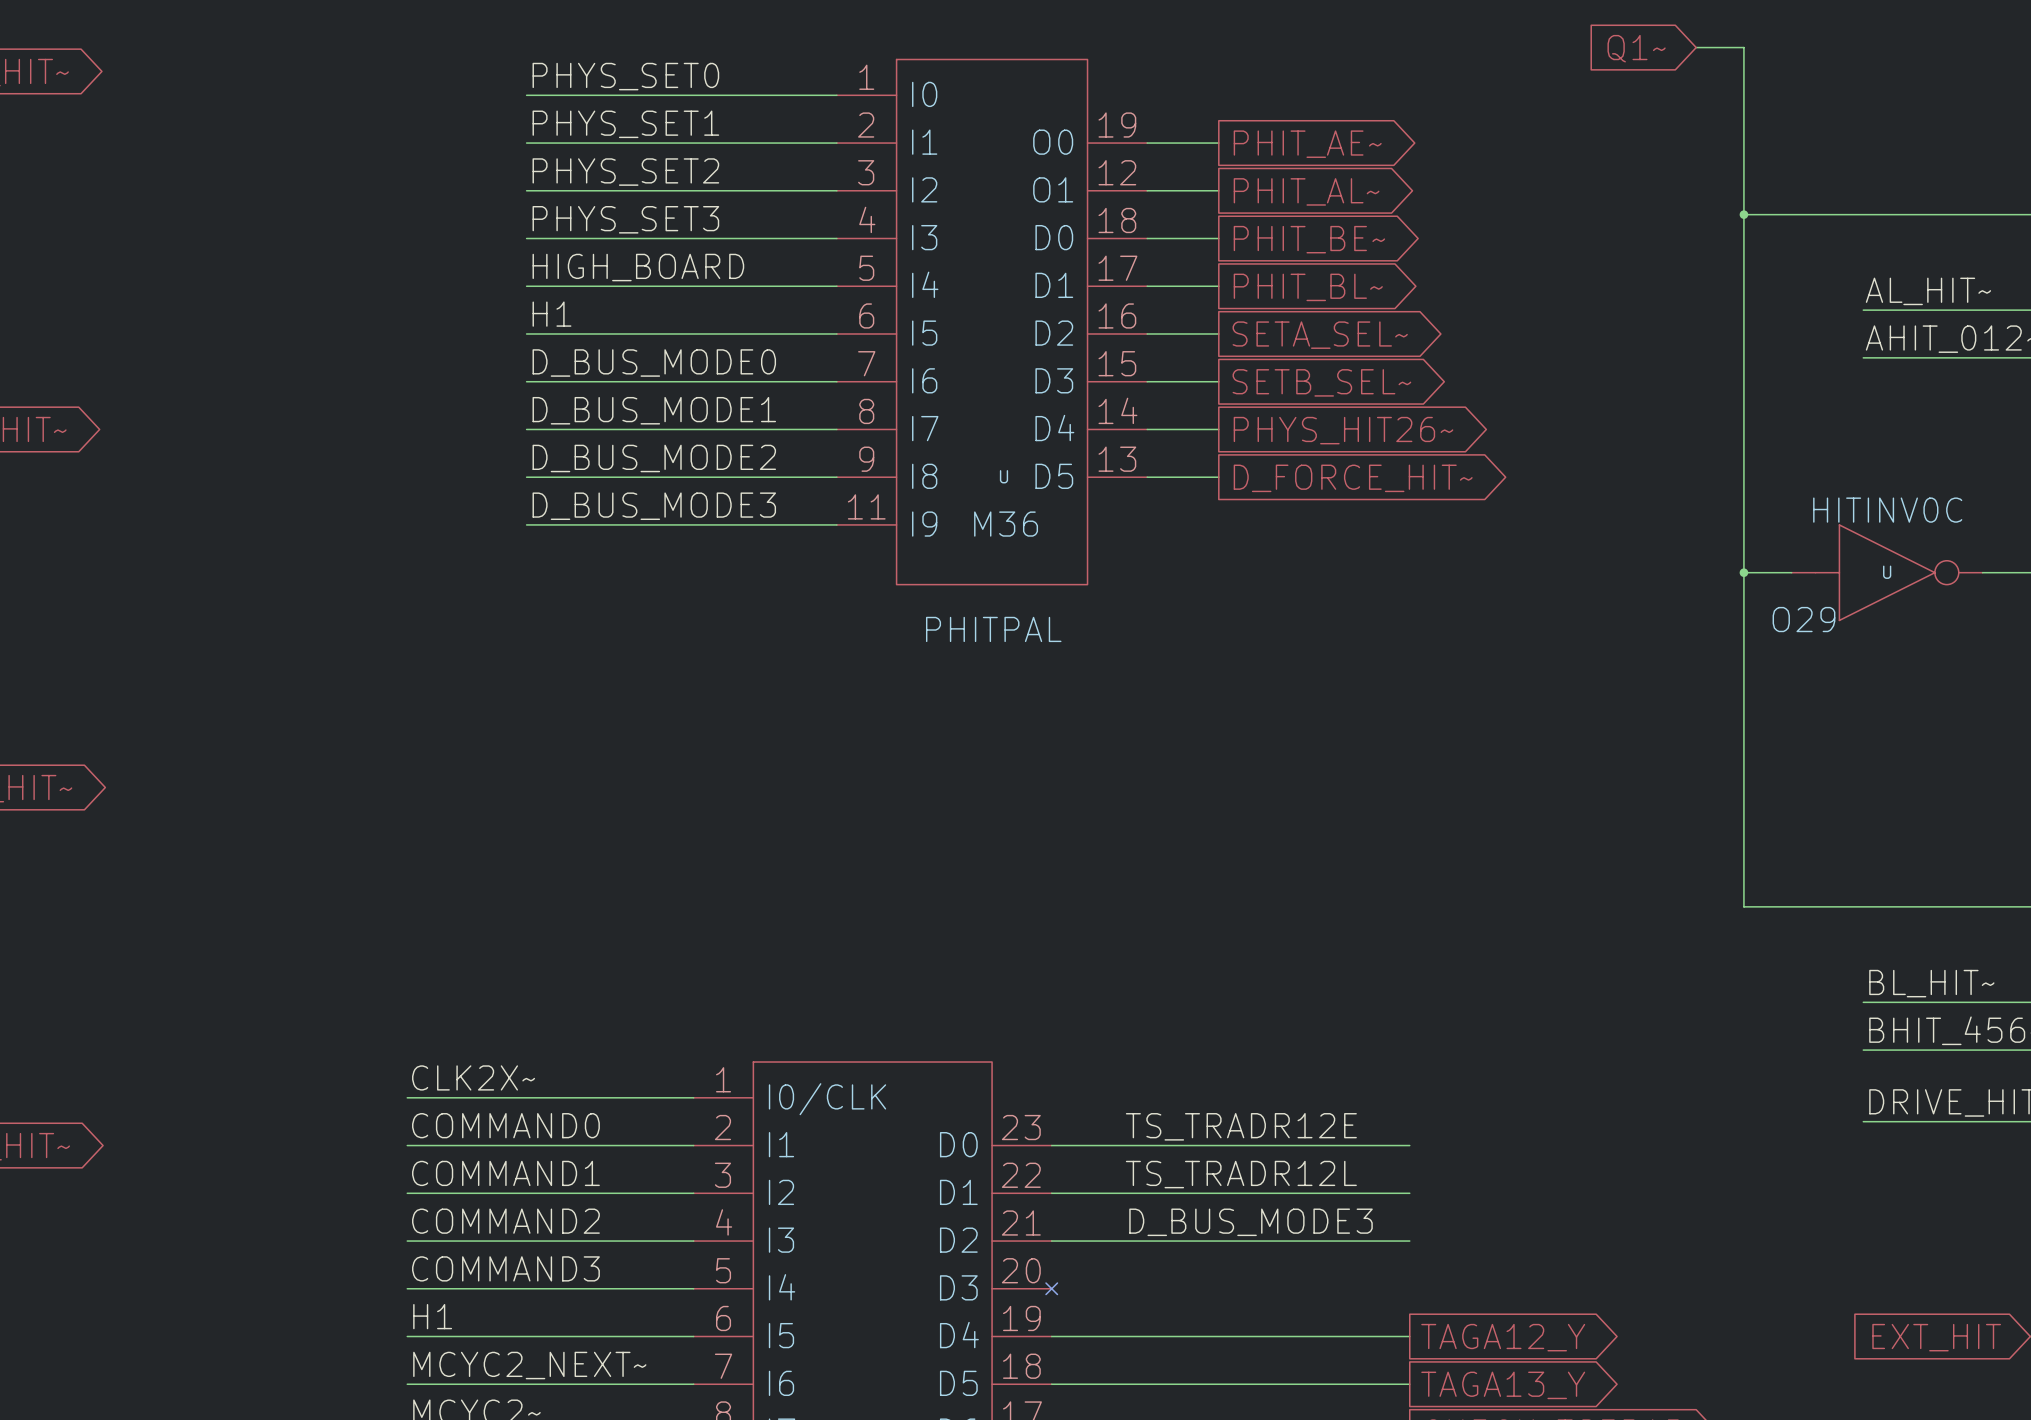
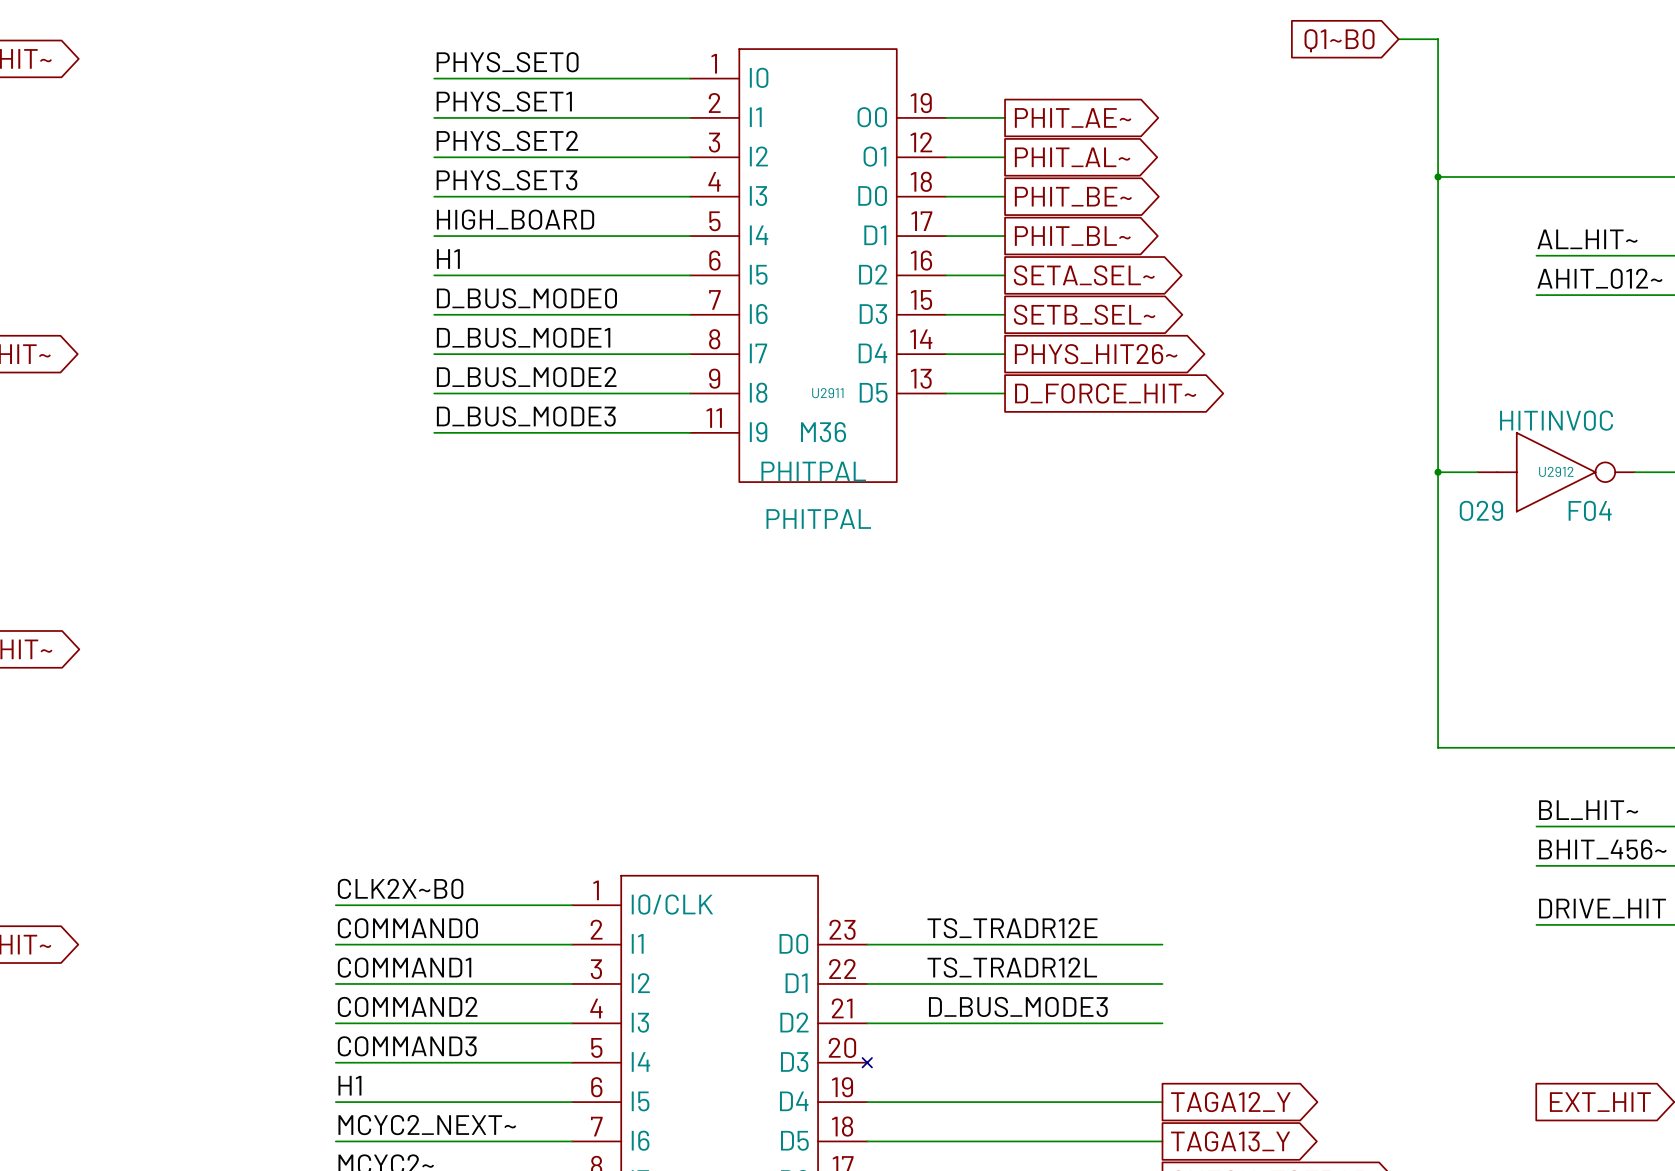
global label: Q1~ (1636, 48) -> Q1~B0 (1339, 40)
U name: U (1003, 476) -> U2911 (827, 393)
U value: none -> PHITPAL (813, 471)
U name: U (1887, 572) -> U2912 (1556, 471)
U value: none -> F04 (1590, 510)
label: CLK2X~ (473, 1077) -> CLK2X~B0 (400, 888)

